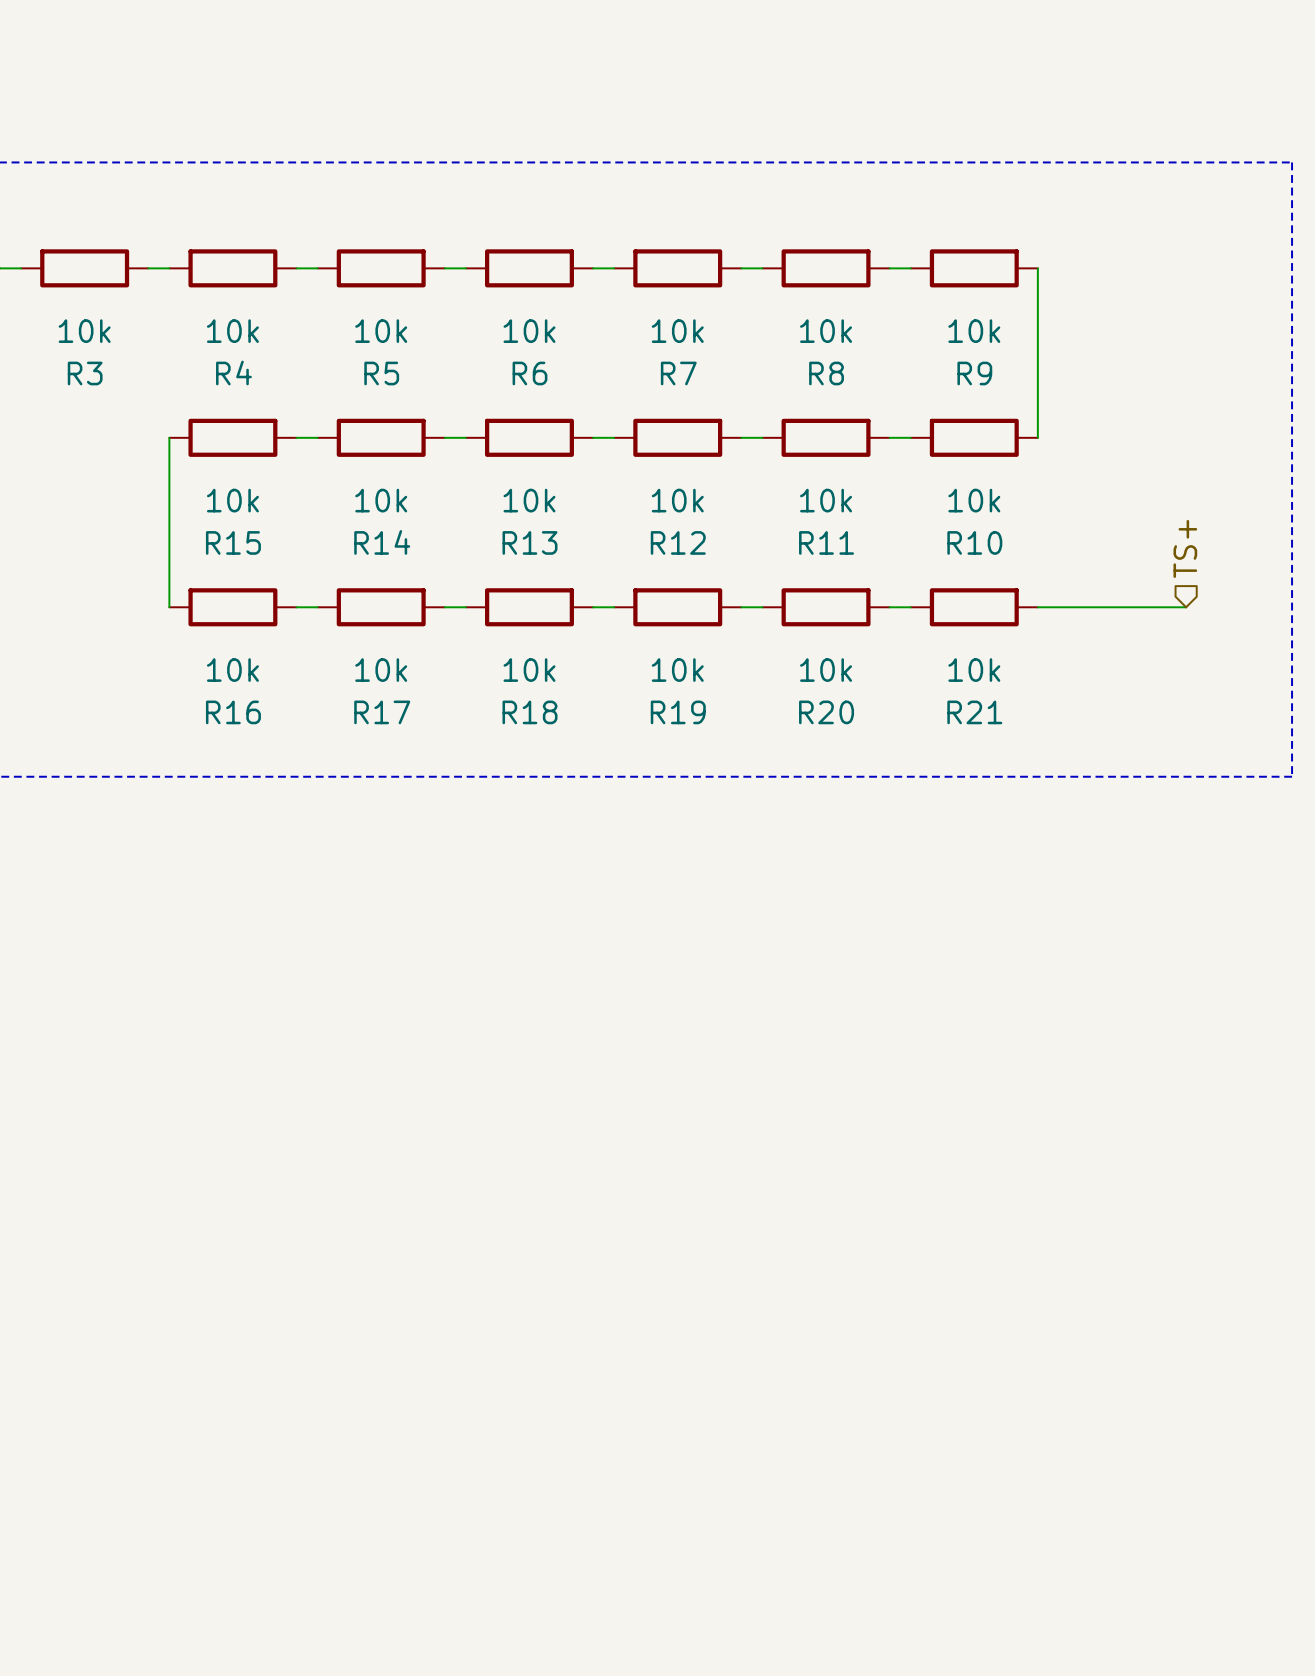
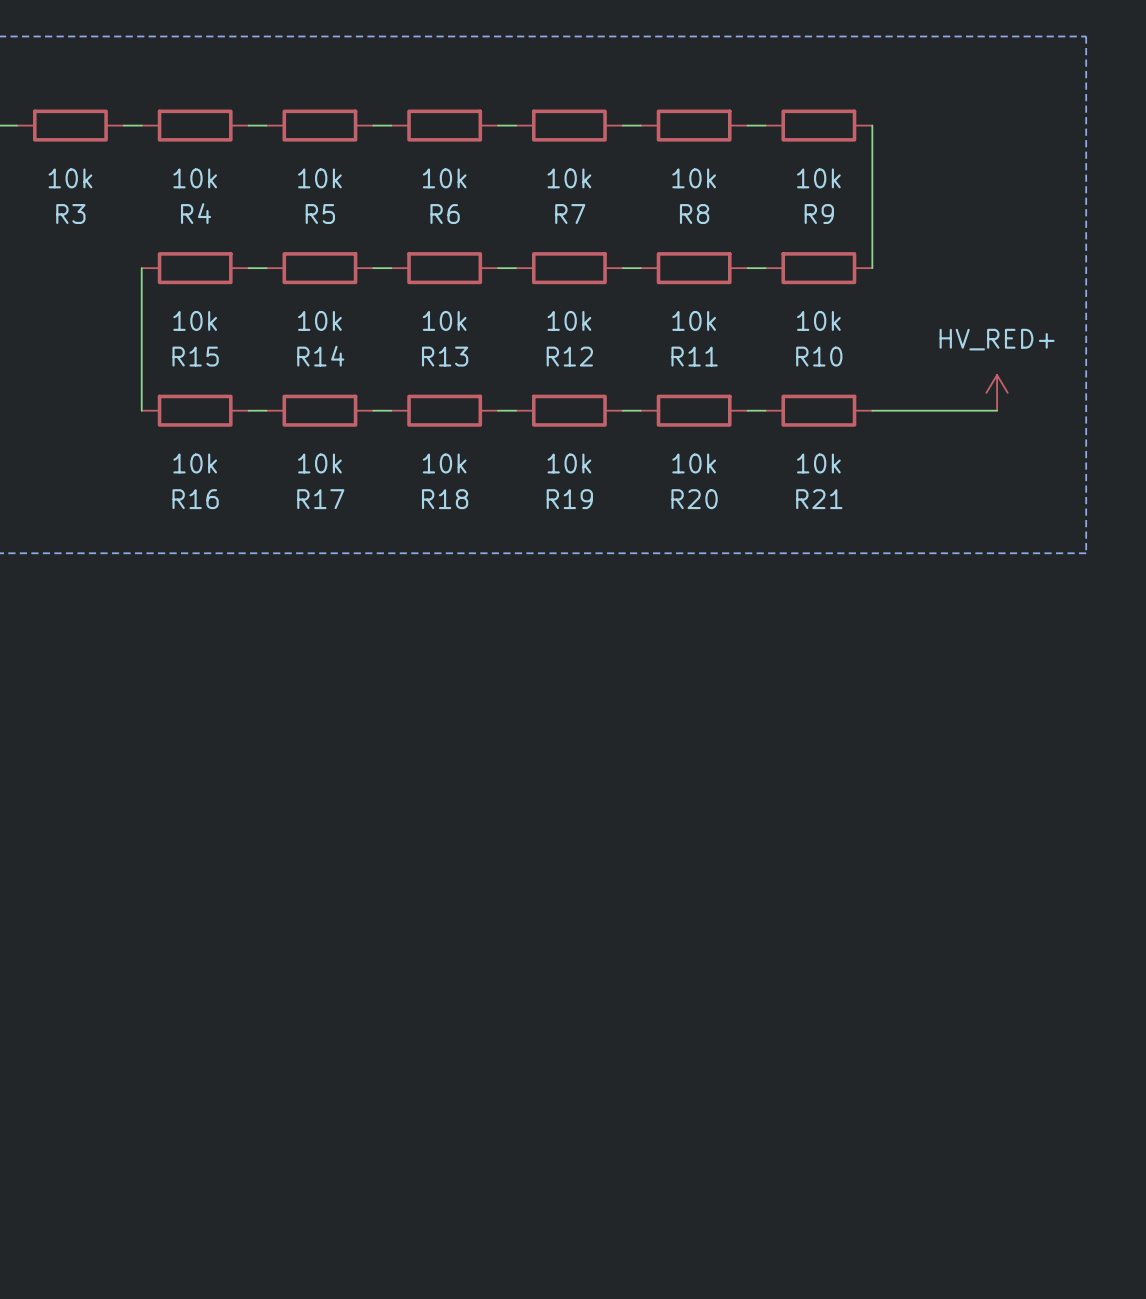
hierarchical label: TS+ (1185, 548) -> none
power symbol: none -> HV_RED+ (997, 392)

